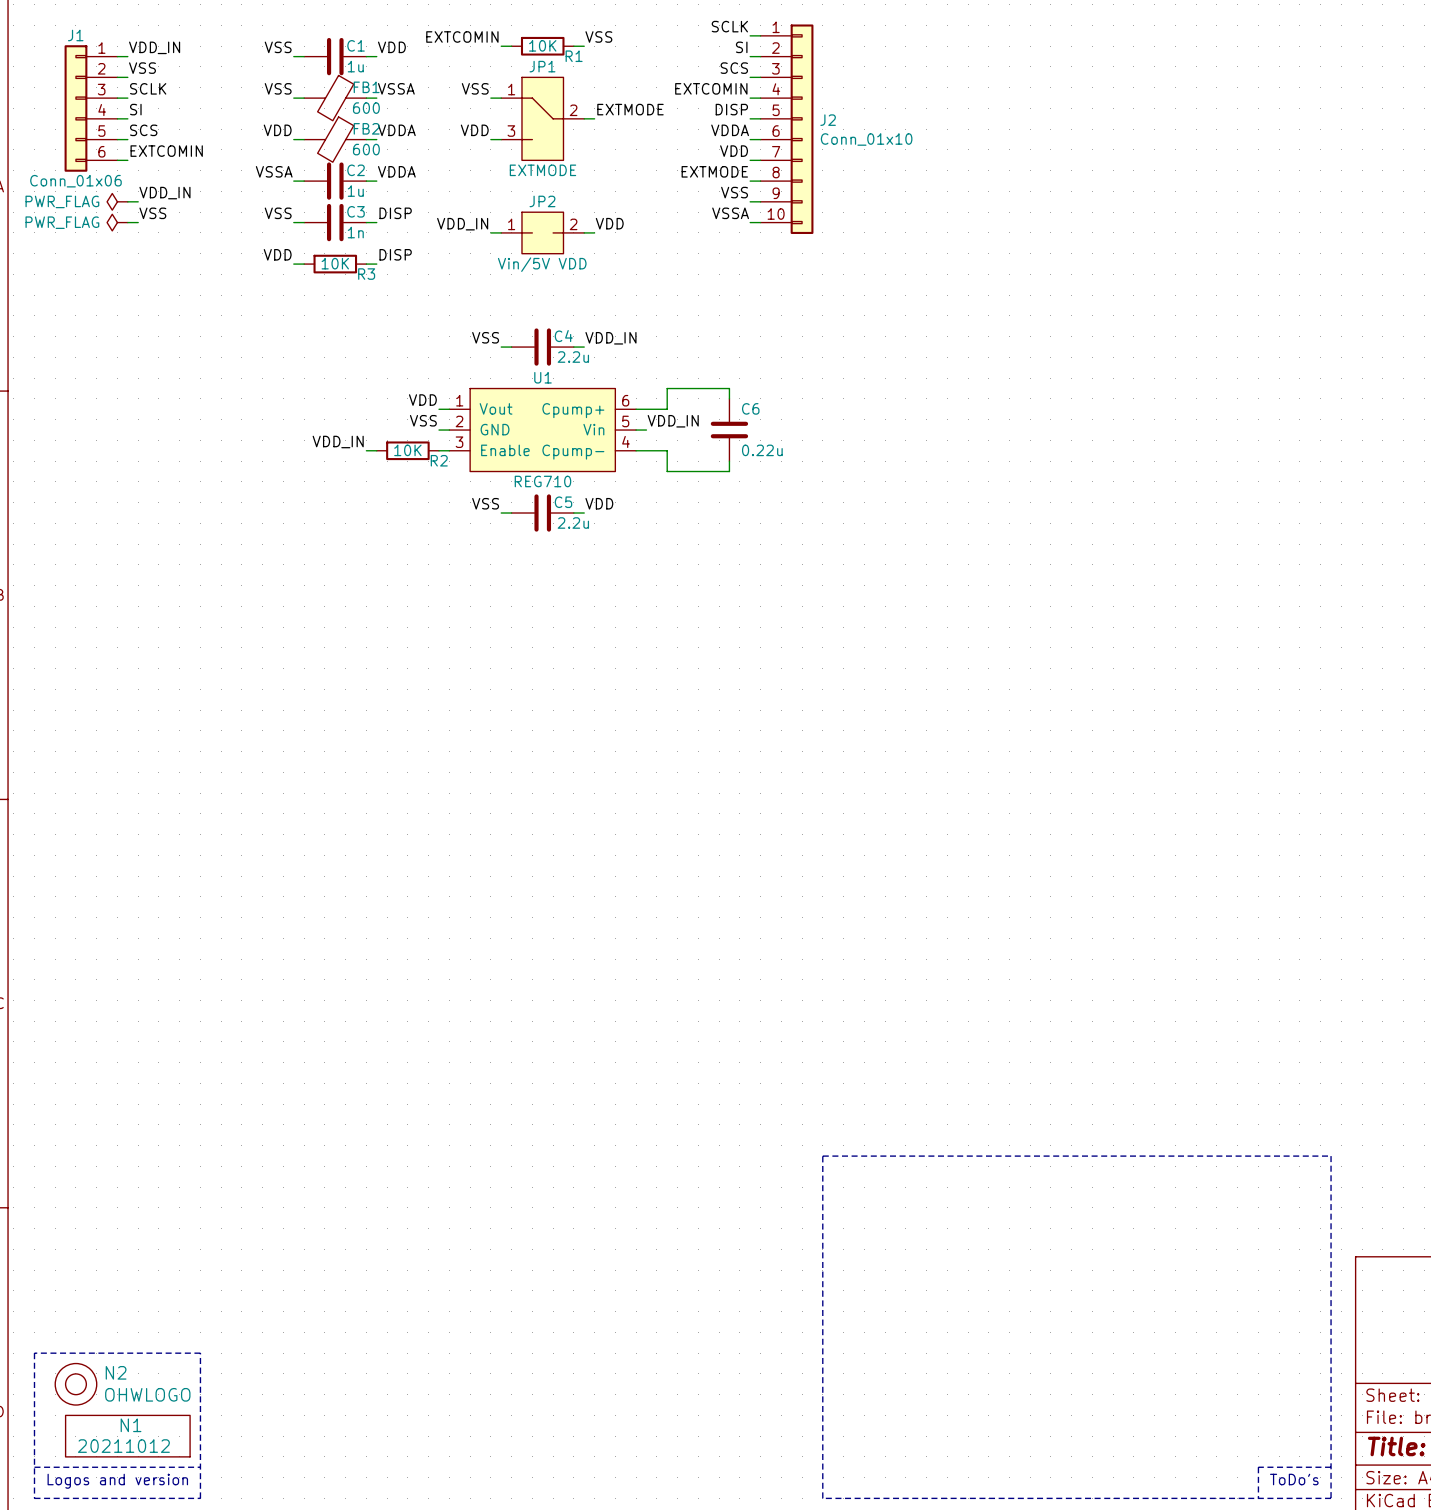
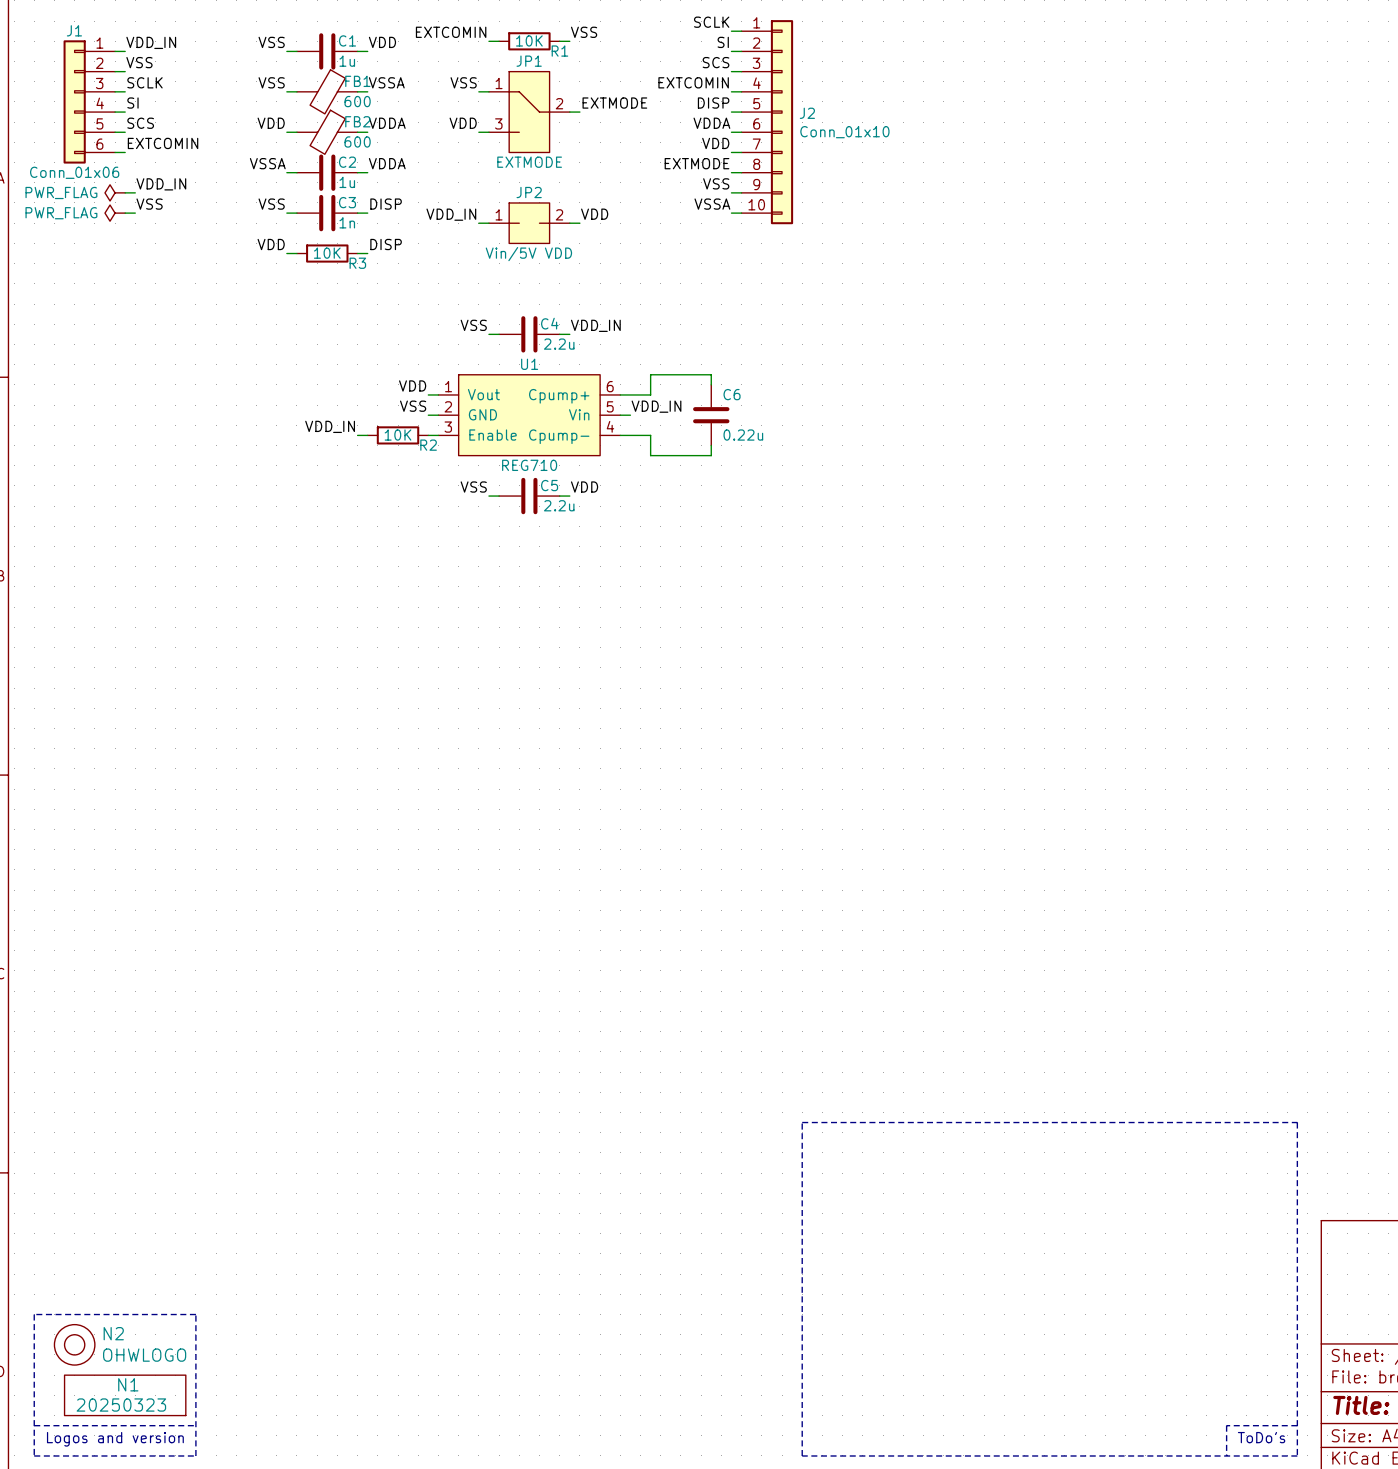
N1 value: 20211012 (123, 1446) -> 20250323 (121, 1405)

